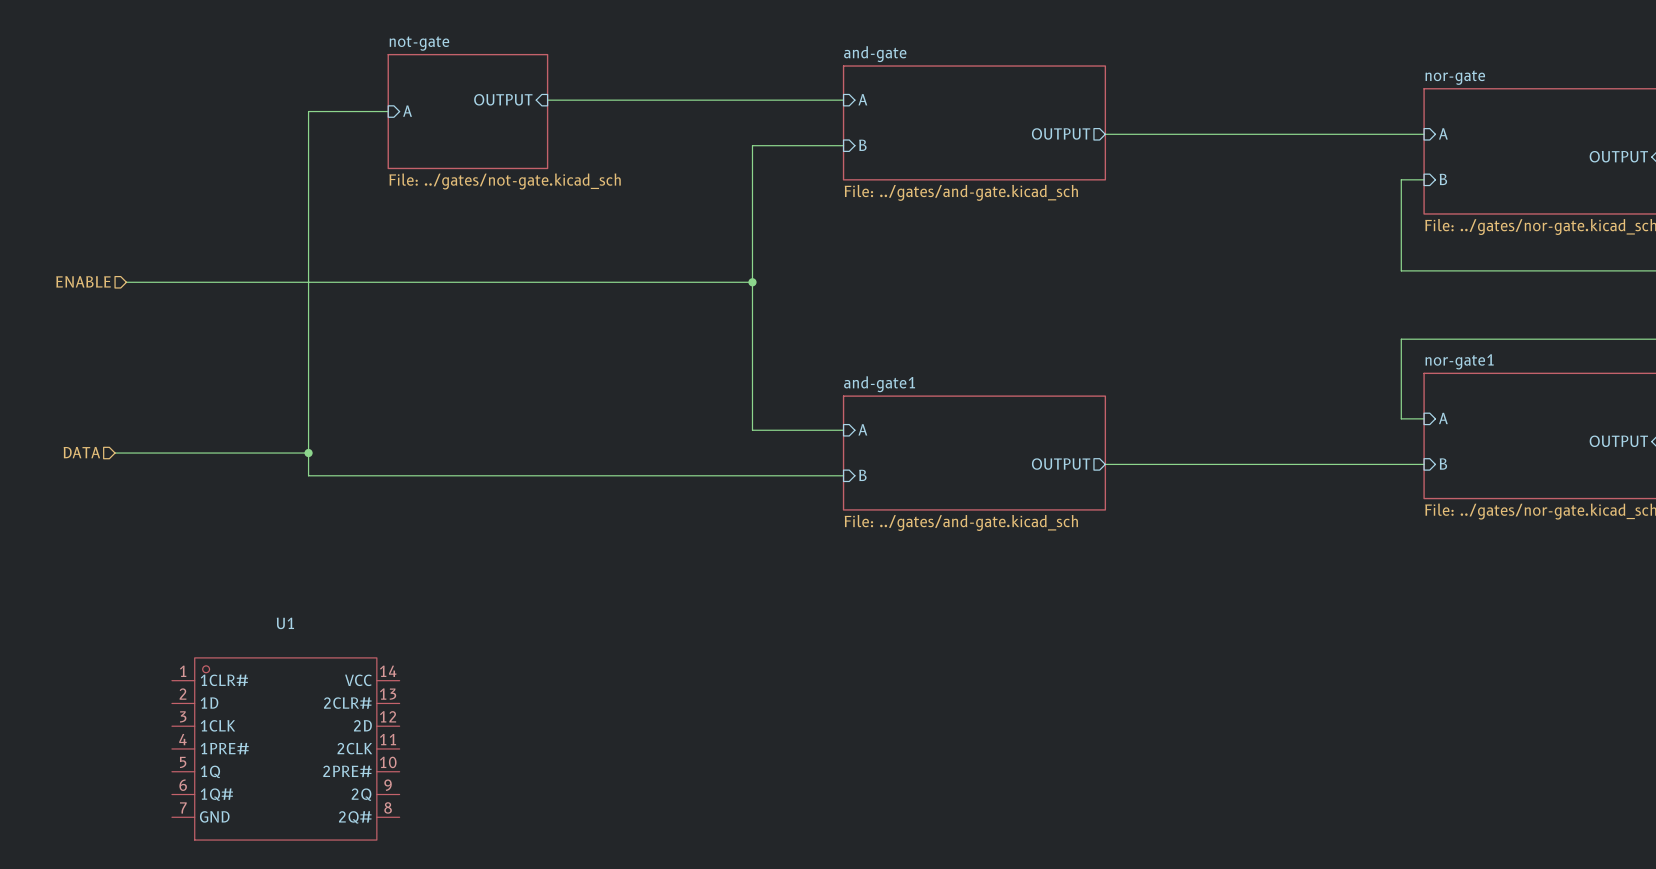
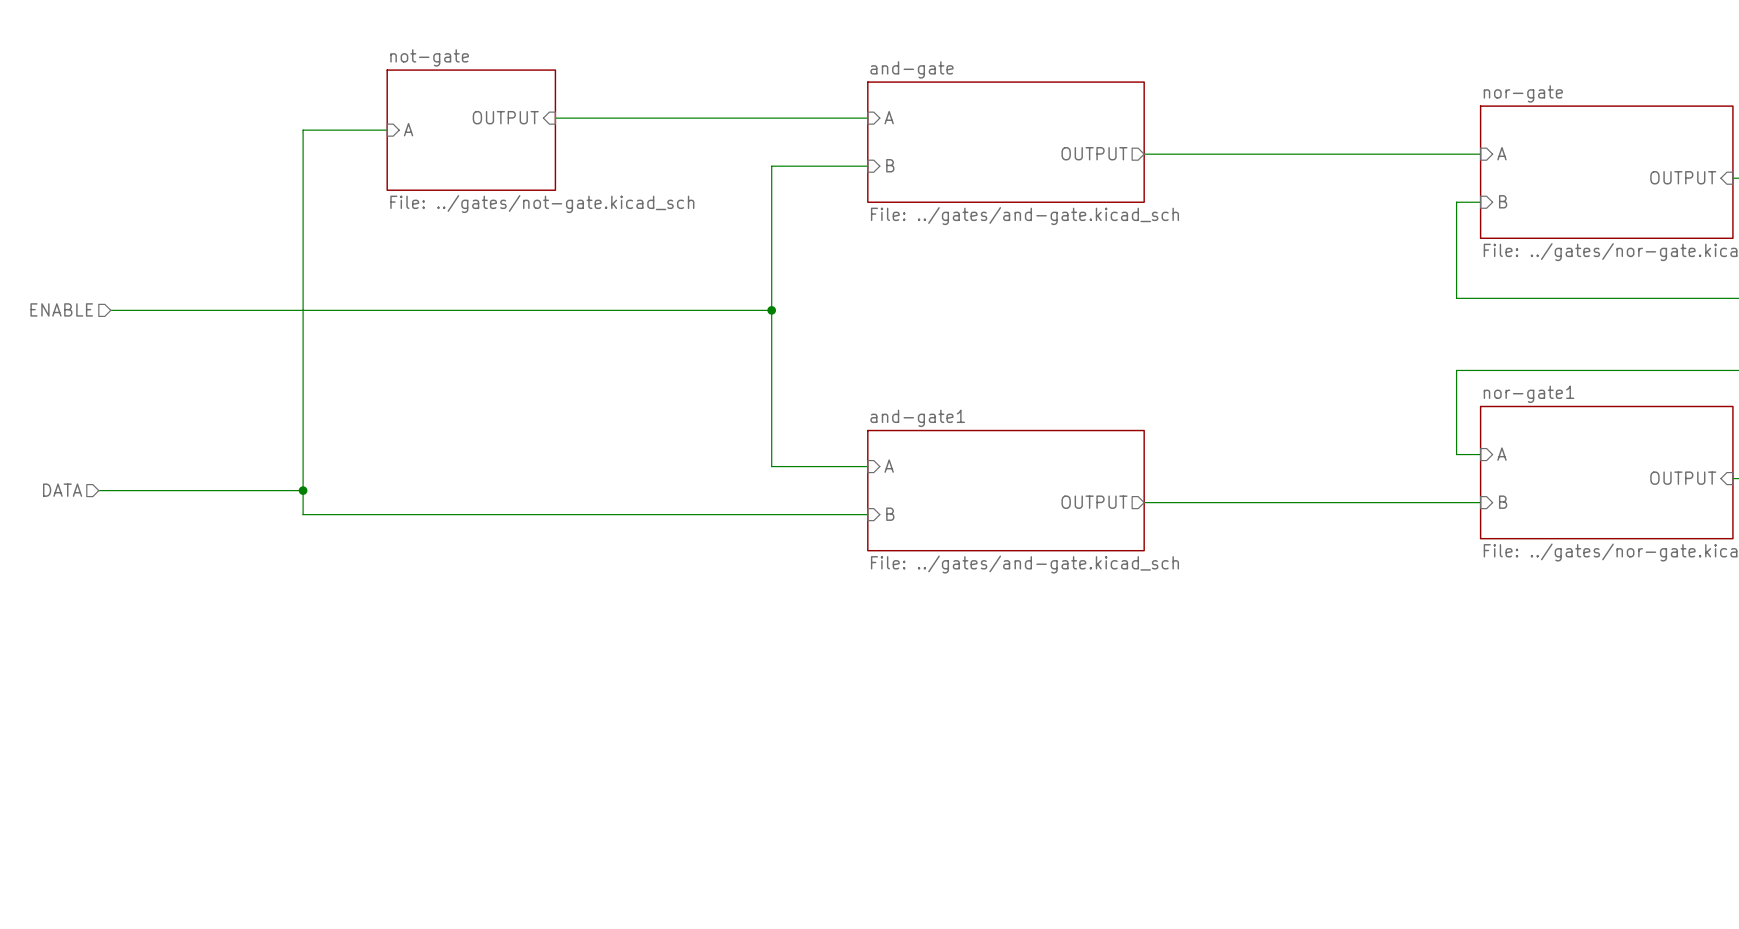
U1: (285, 748) -> none

